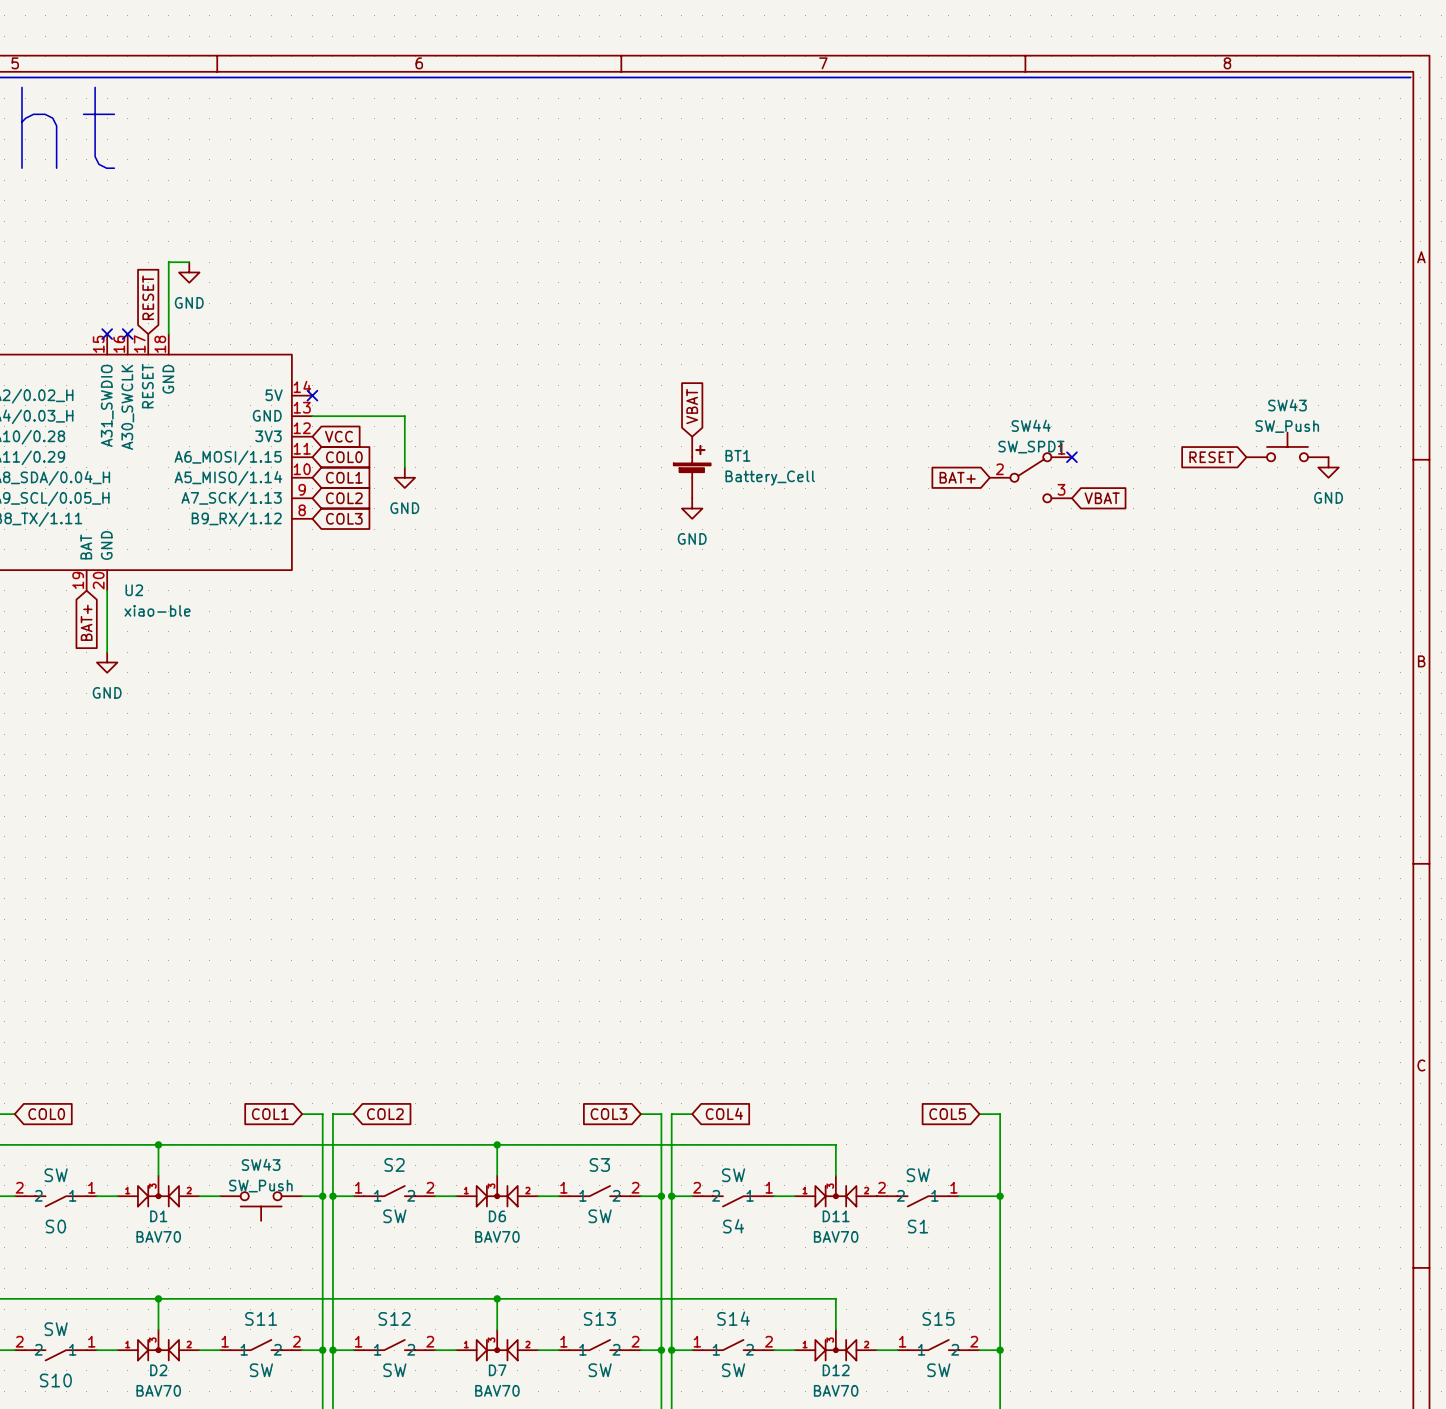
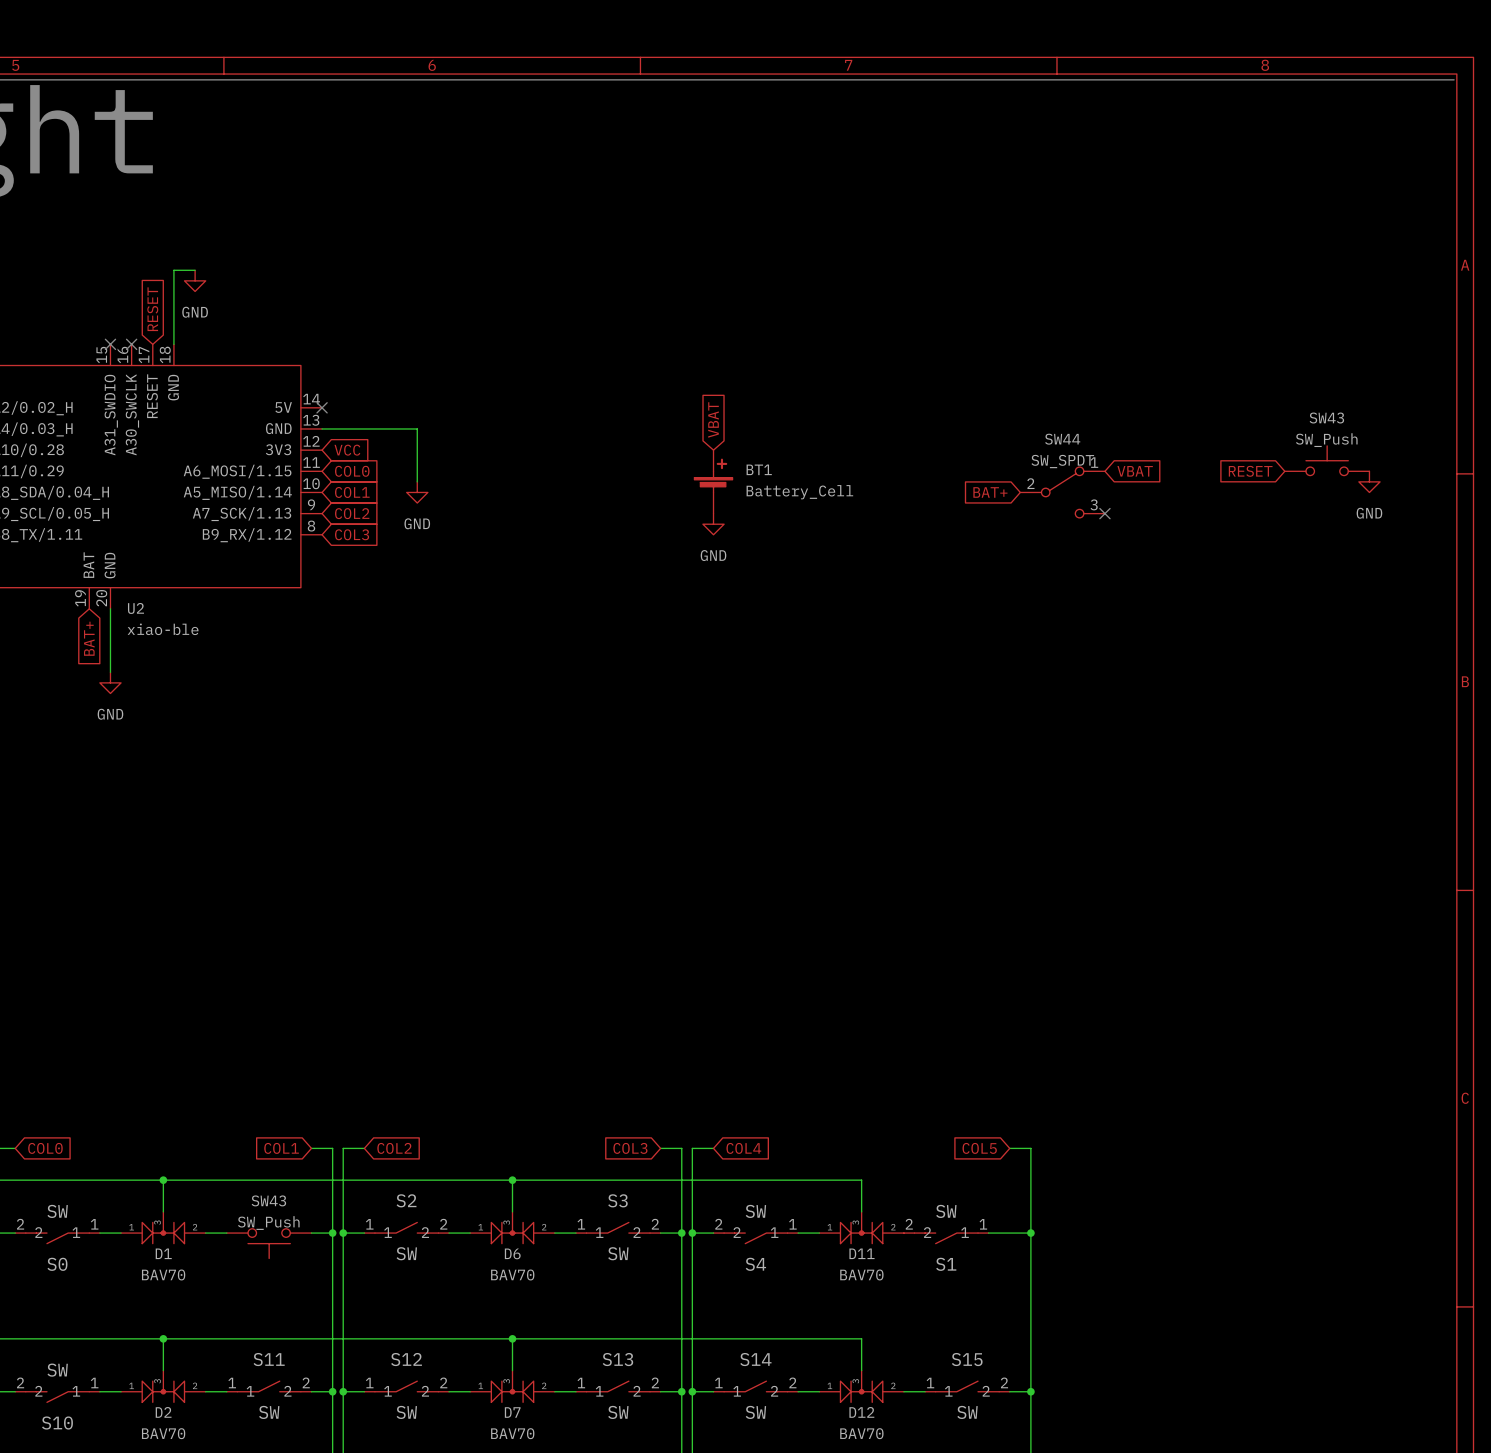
no-connect mark position: (1071, 457) -> (1104, 513)
global label position: VBAT (1102, 498) -> VBAT (1135, 471)

